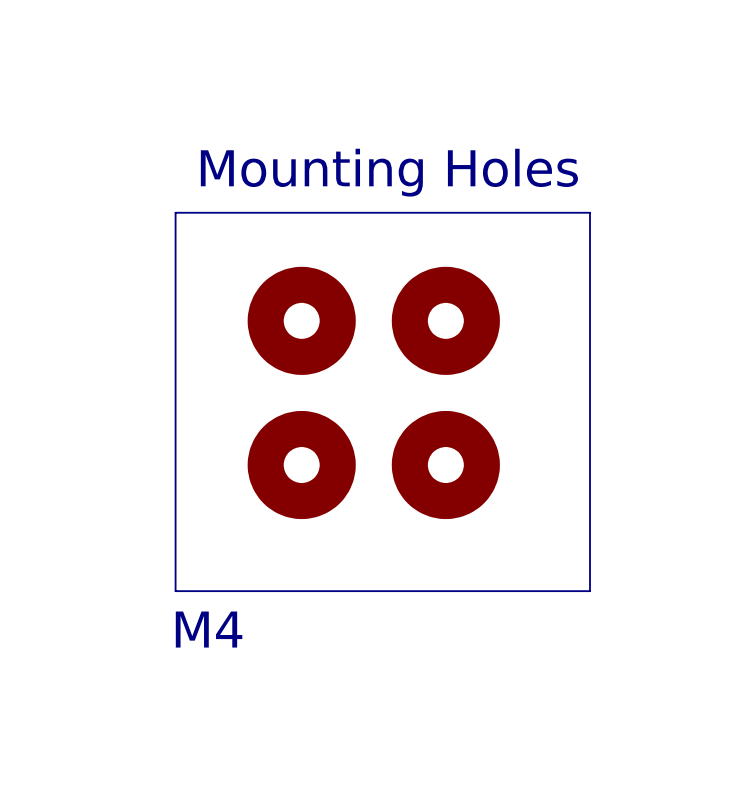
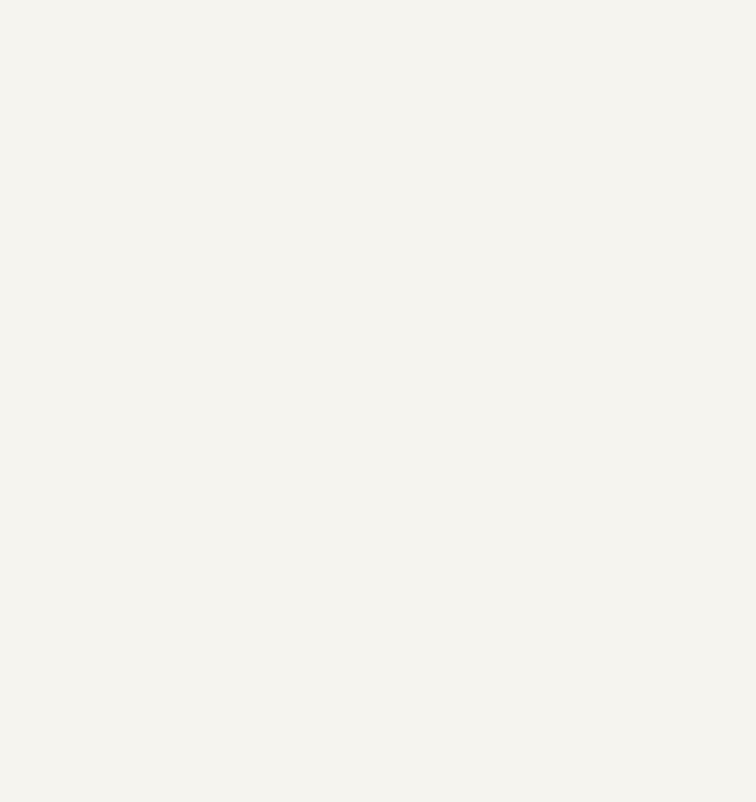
text: Mounting Holes (389, 172) -> none
line: (175, 212) (589, 212) (589, 591) (175, 591) (175, 212) -> none
part: (301, 320) -> none
part: (445, 320) -> none
part: (301, 465) -> none
part: (445, 465) -> none
text: M4 (209, 629) -> none

